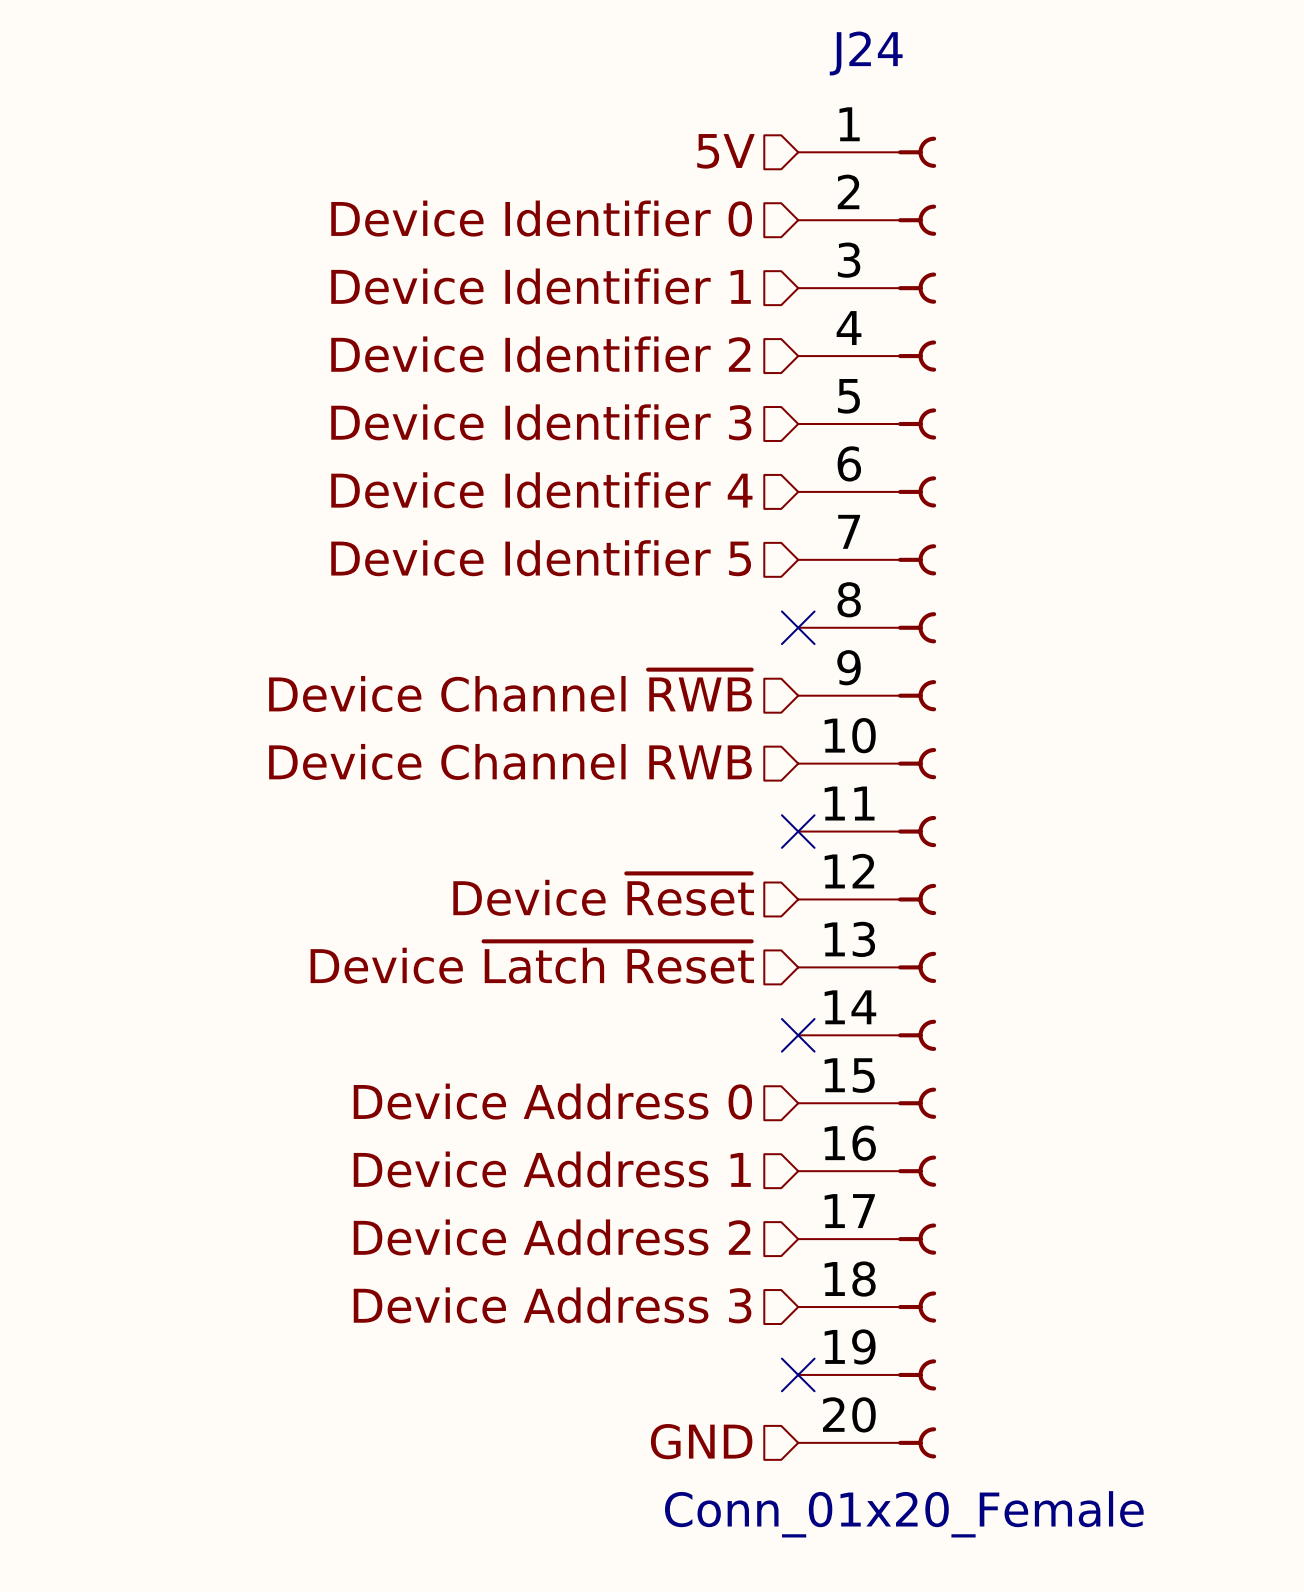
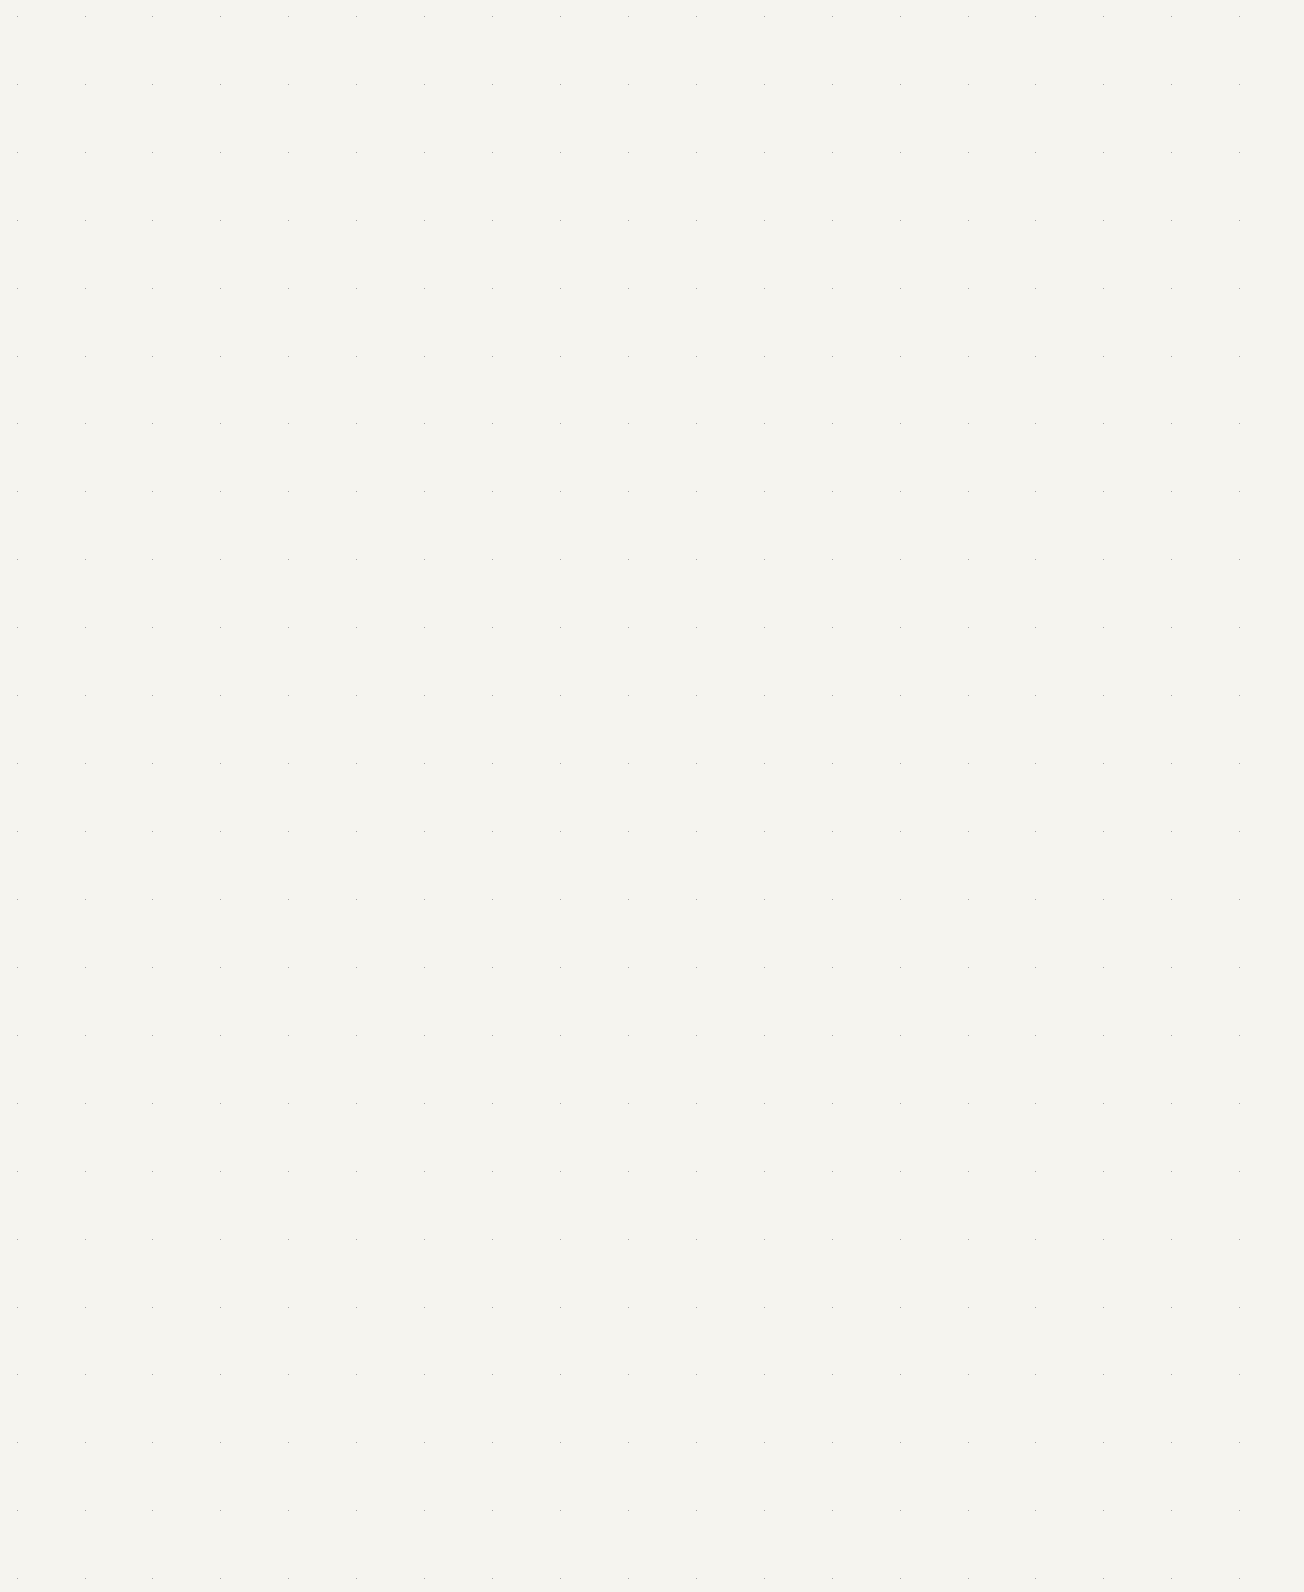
hierarchical label: 5V (725, 151) -> none
hierarchical label: Device Identifier 0 (541, 218) -> none
hierarchical label: Device Identifier 1 (541, 286) -> none
hierarchical label: Device Identifier 2 (540, 354) -> none
hierarchical label: Device Identifier 3 (541, 422) -> none
hierarchical label: Device Identifier 4 (541, 490) -> none
hierarchical label: Device Identifier 5 (541, 558) -> none
no-connect mark: (798, 627) -> none
hierarchical label: Device Channel ~{RWB} (510, 690) -> none
hierarchical label: Device Channel RWB (510, 761) -> none
J24: Conn_01x20_Female (867, 797) -> none
no-connect mark: (798, 831) -> none
hierarchical label: Device ~{Reset} (603, 894) -> none
hierarchical label: Device ~{Latch Reset} (532, 962) -> none
no-connect mark: (798, 1035) -> none
hierarchical label: Device Address 0 (552, 1101) -> none
hierarchical label: Device Address 1 (552, 1169) -> none
hierarchical label: Device Address 2 (552, 1237) -> none
hierarchical label: Device Address 3 (552, 1305) -> none
no-connect mark: (798, 1374) -> none
hierarchical label: GND (701, 1441) -> none

